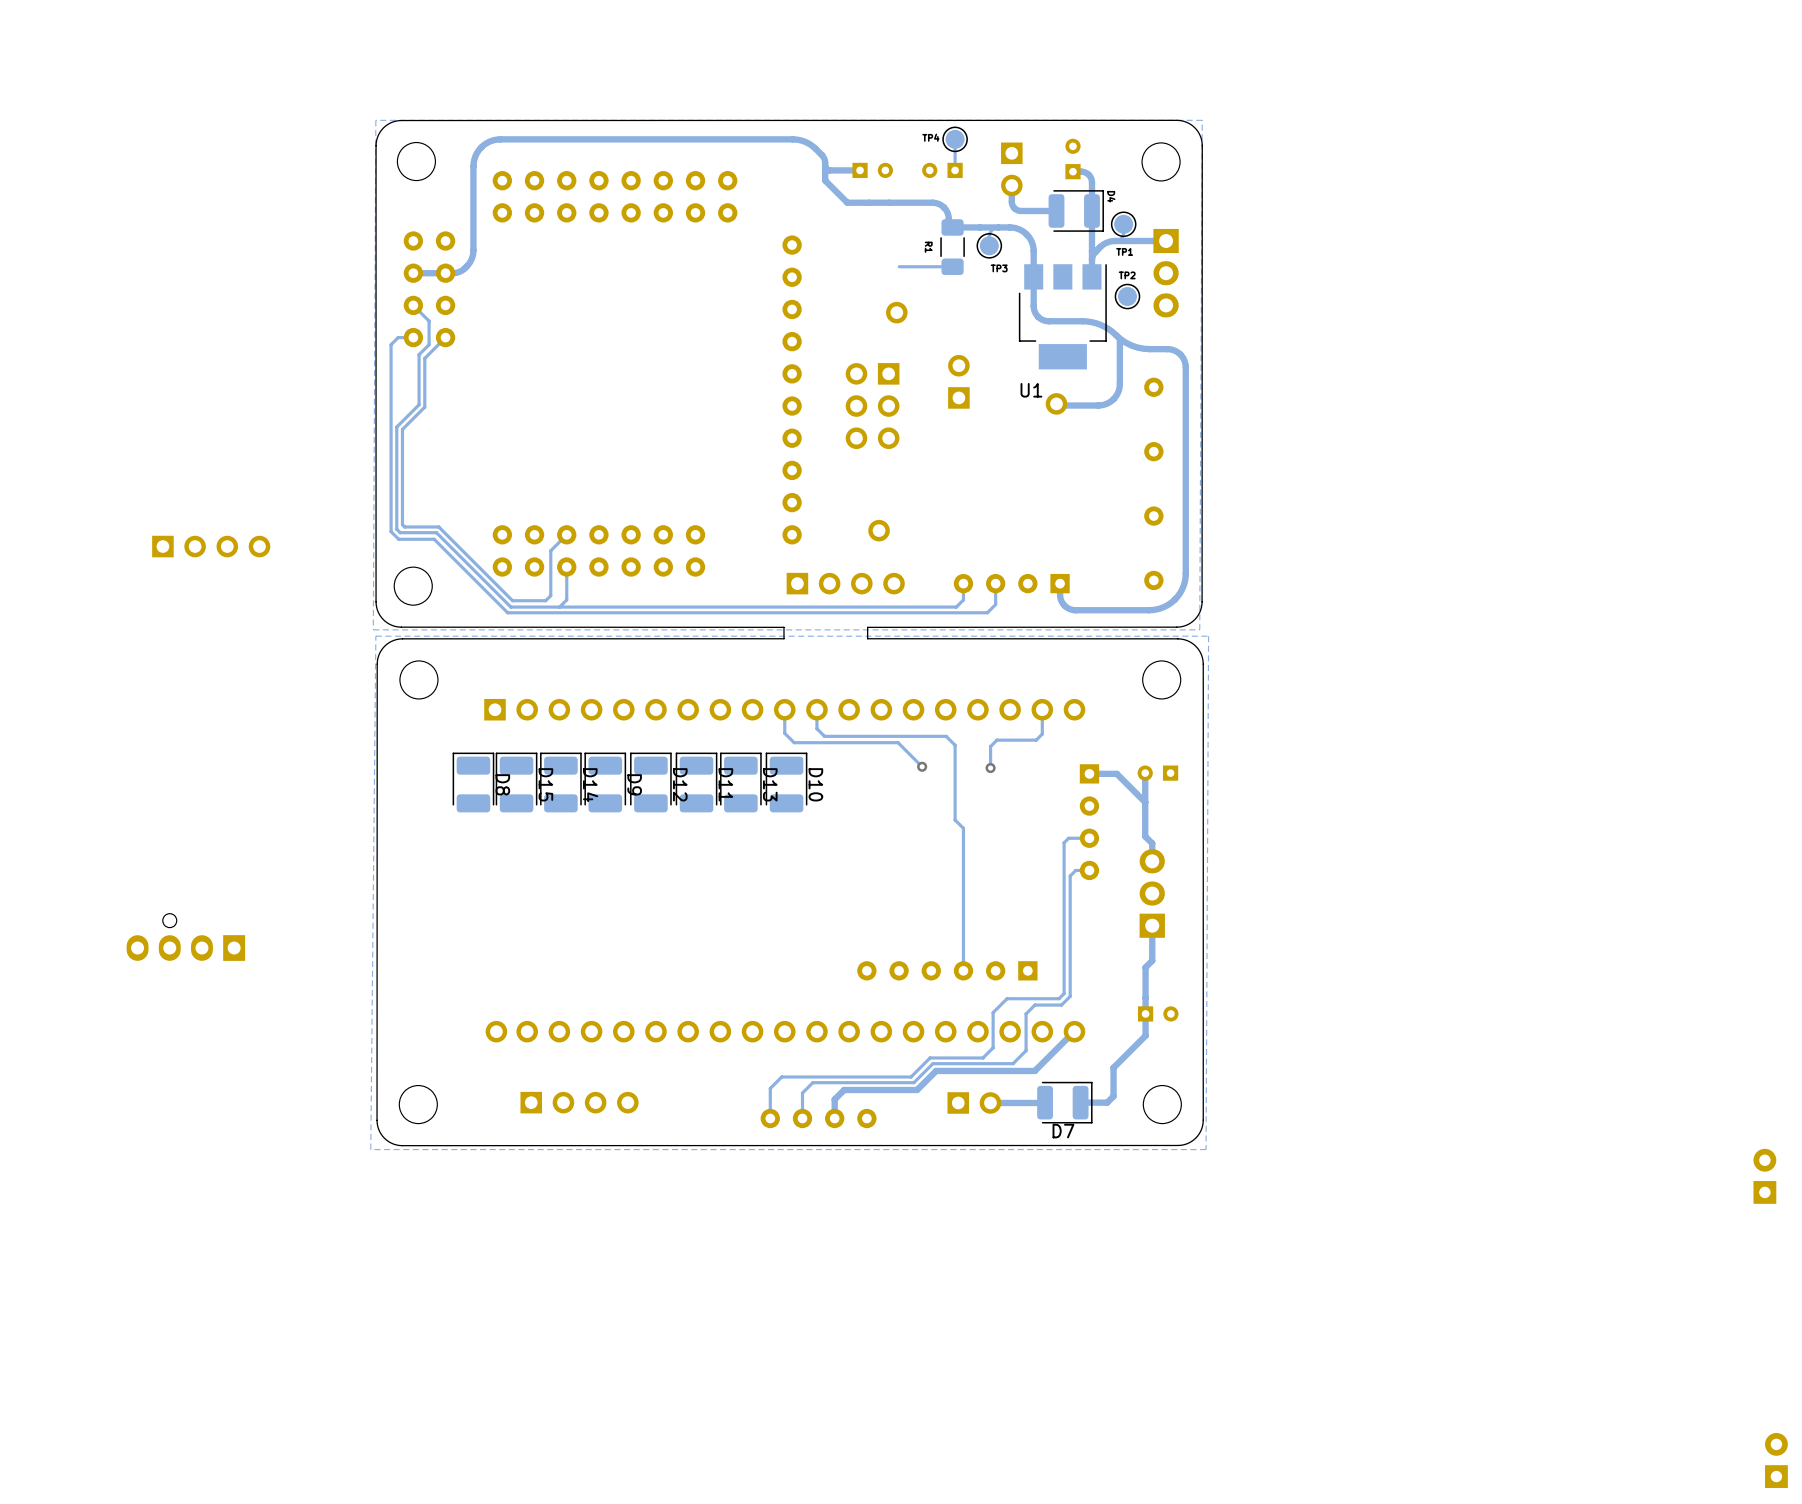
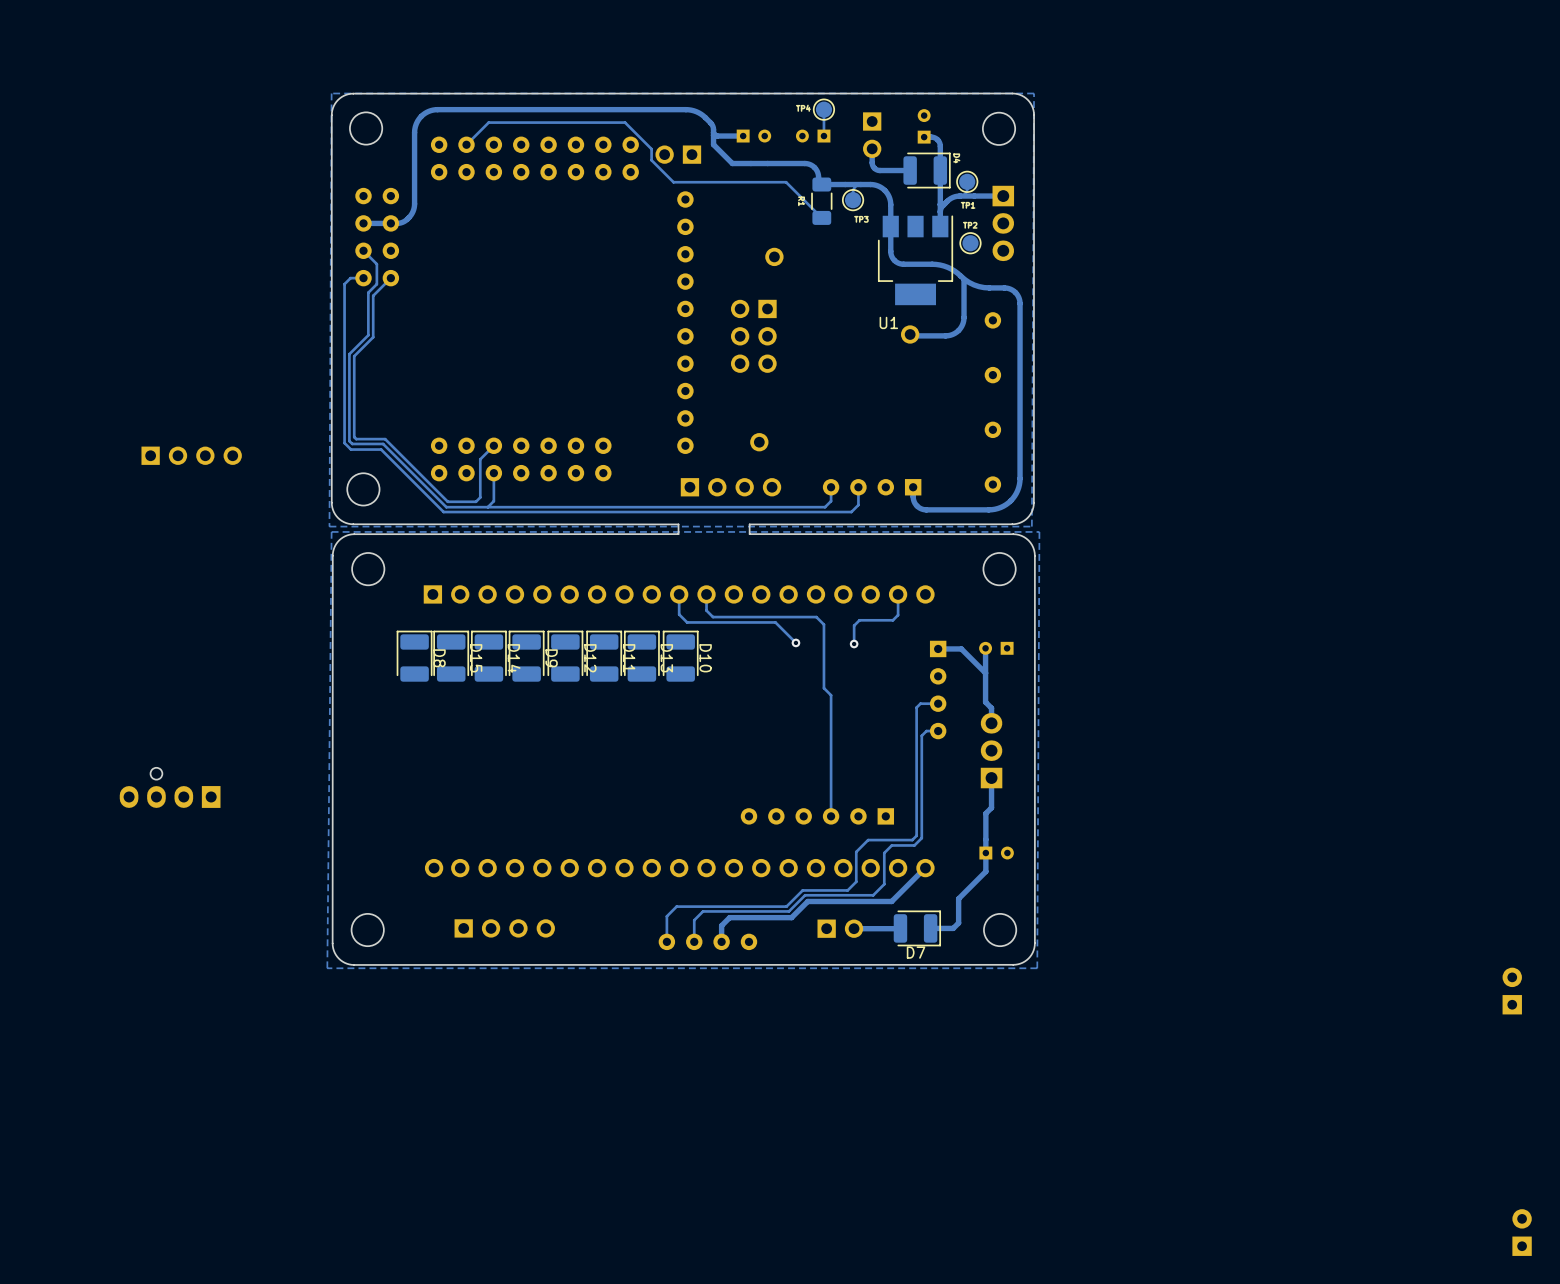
track: none -> (466, 144) (488, 122) (625, 122) (651, 149) (651, 160) (673, 182) (786, 182) (821, 217)
track: (948, 266) (899, 266) -> none
part rotation: 0° (958, 381) -> 90° counterclockwise (678, 154)
part position: (958, 381) -> (678, 154)

